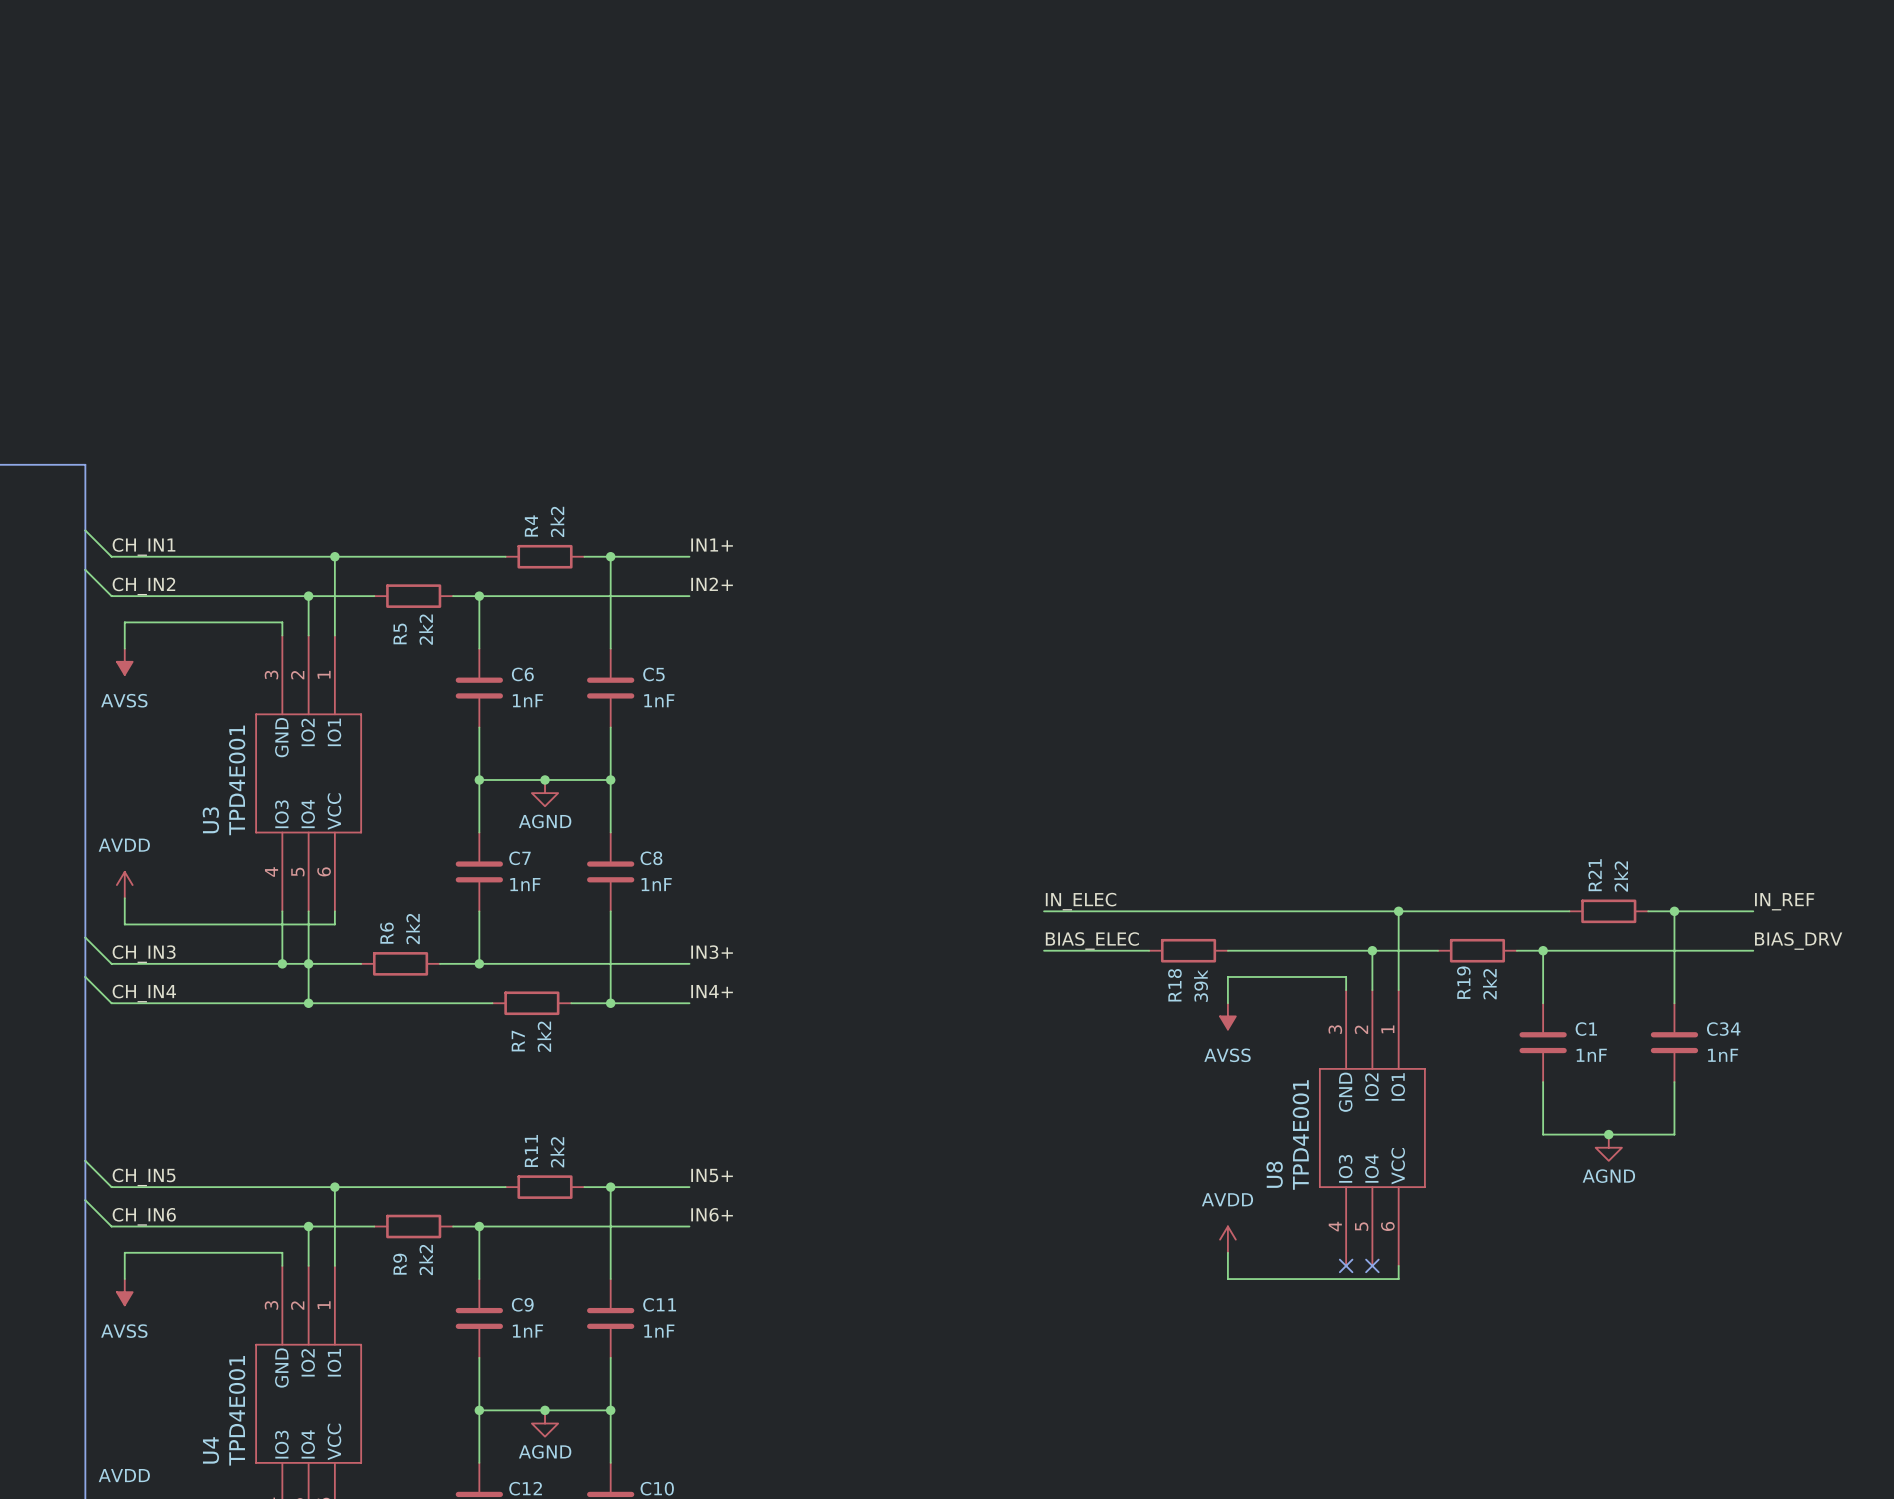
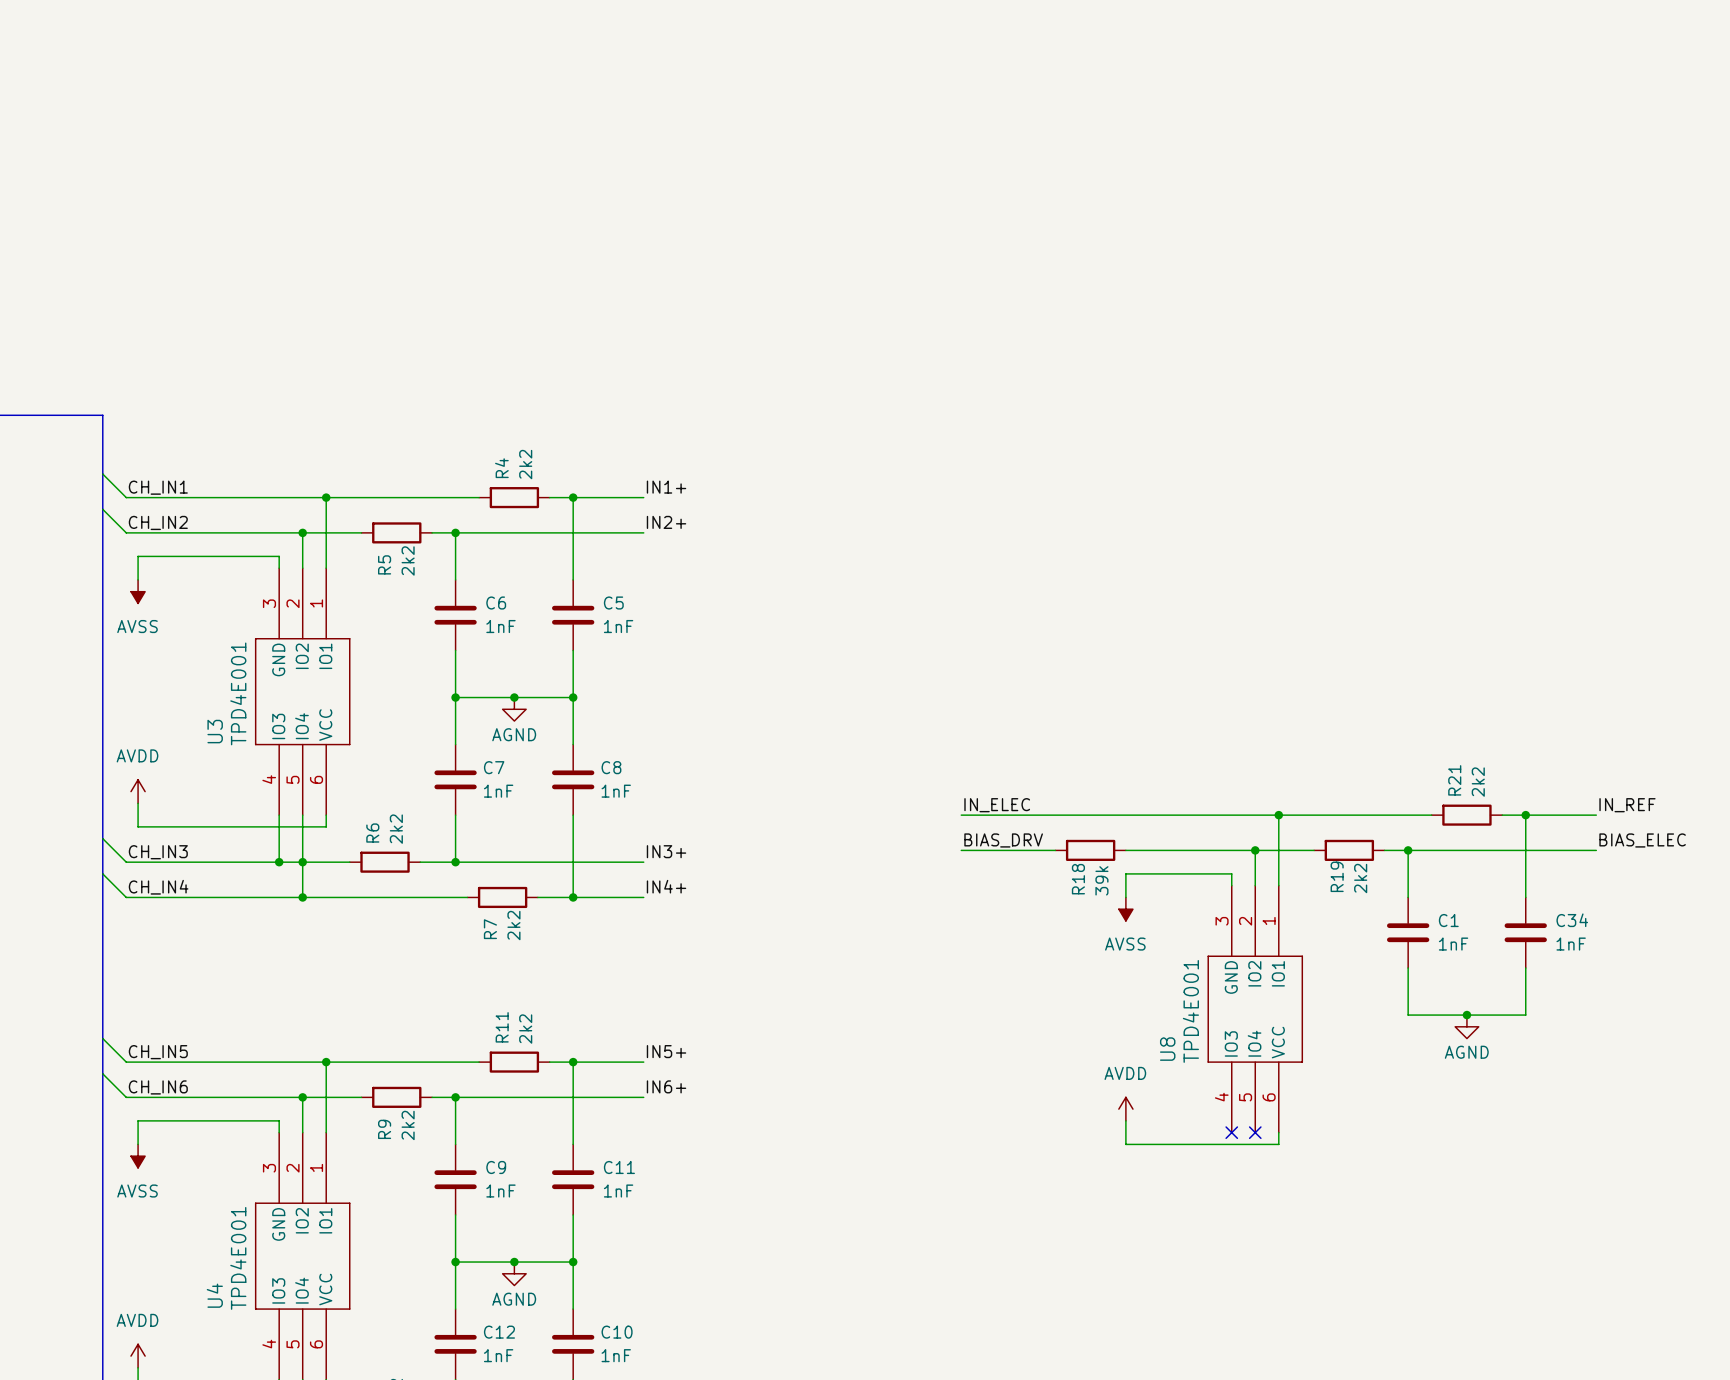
label: BIAS_ELEC (1092, 941) -> BIAS_DRV (1003, 840)
label: BIAS_DRV (1798, 941) -> BIAS_ELEC (1642, 840)

